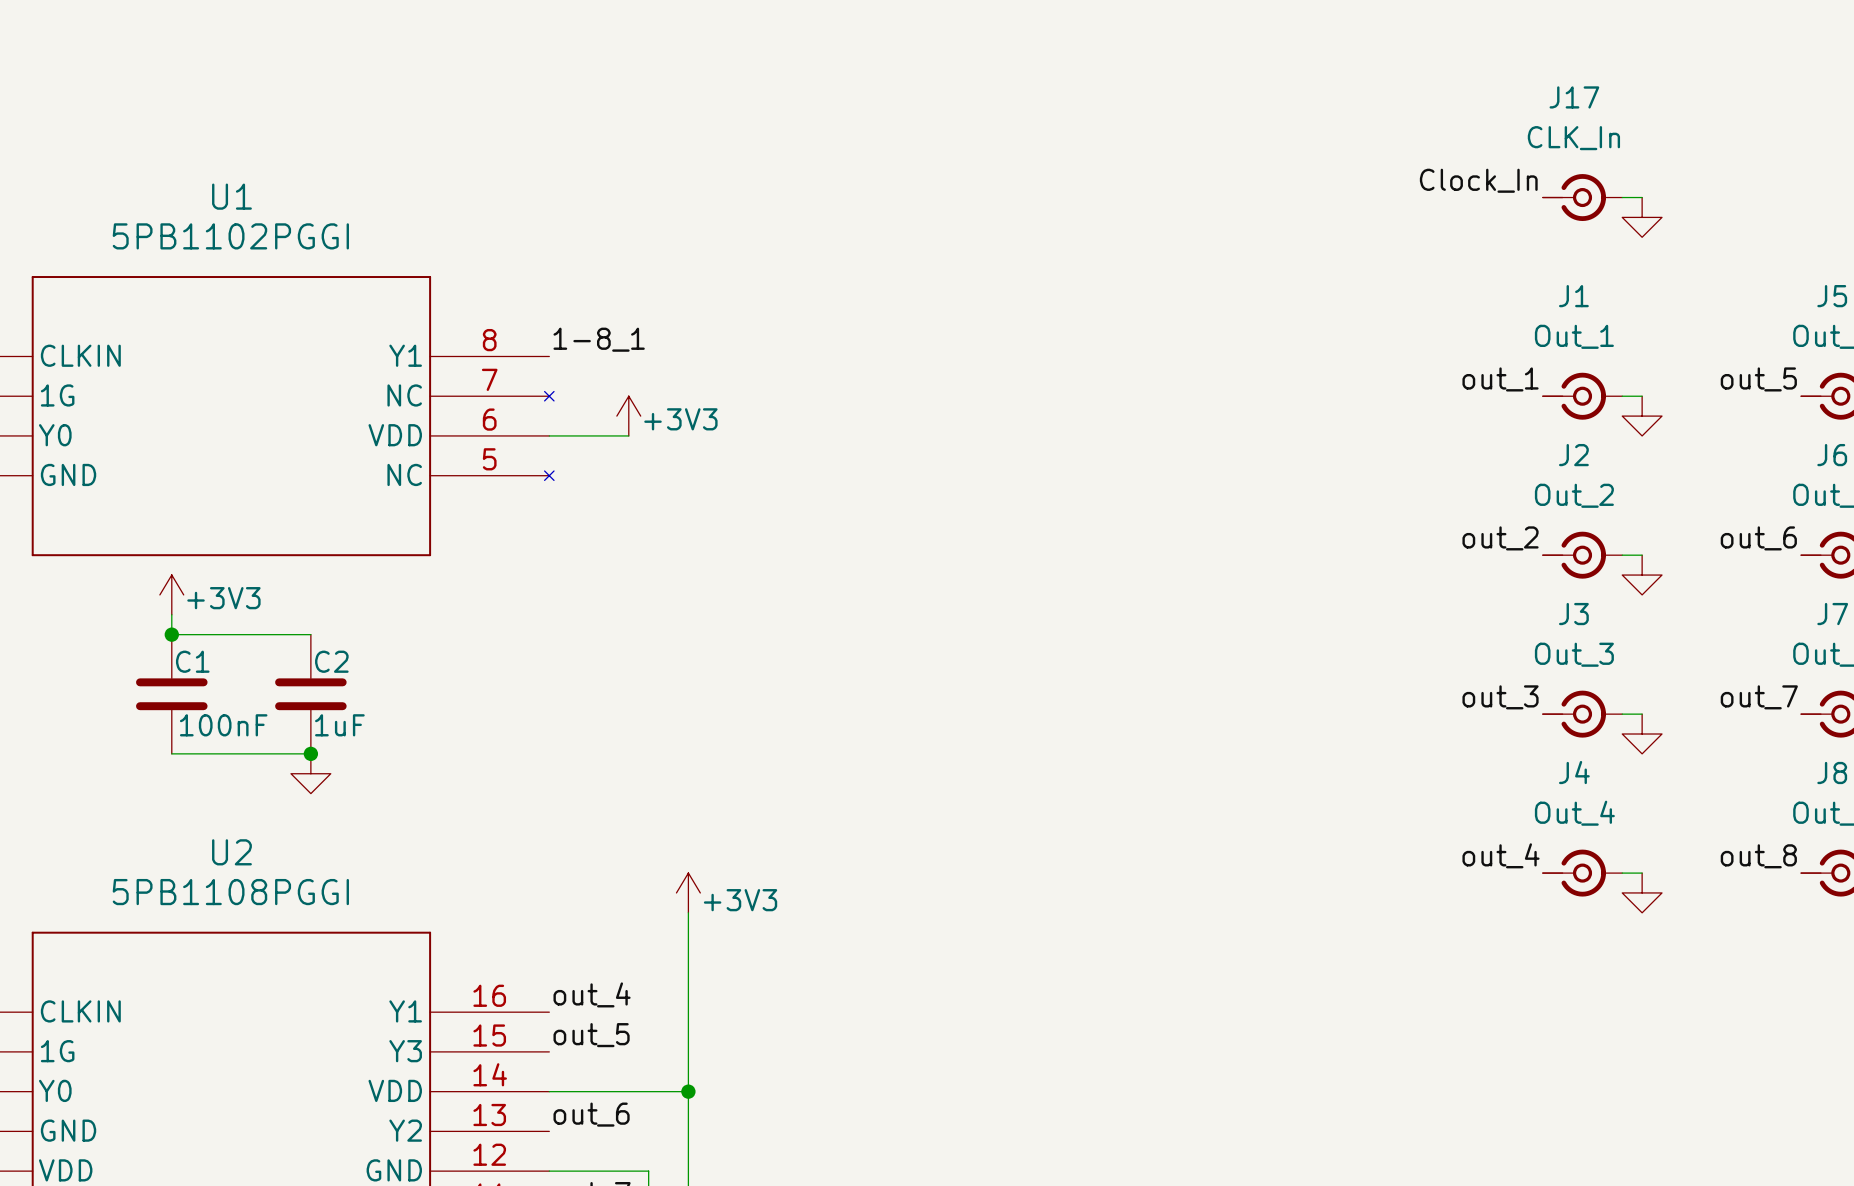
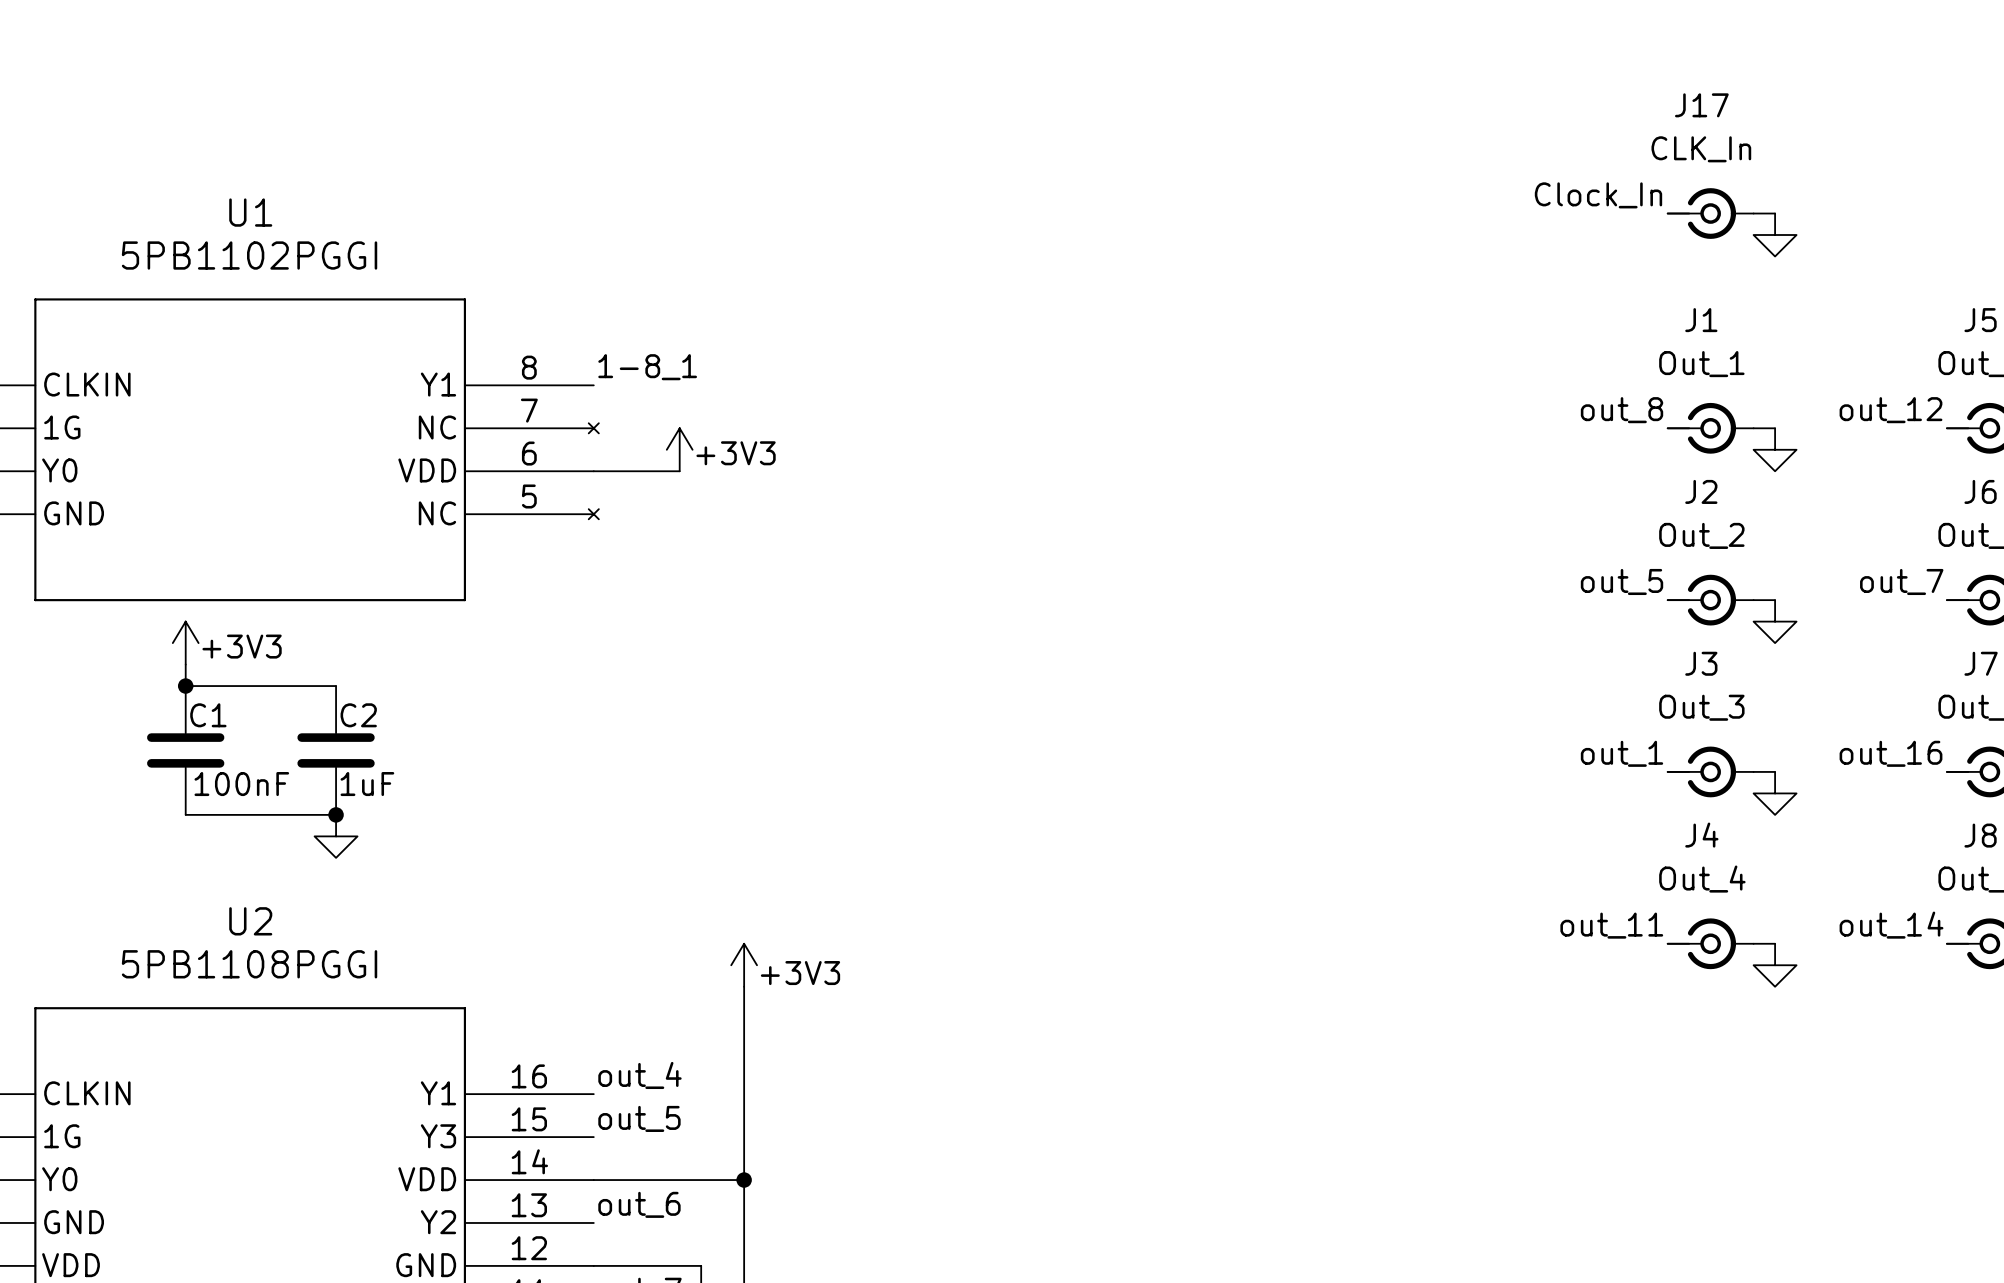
label: out_1 (1500, 379) -> out_8 (1622, 410)
label: out_5 (1758, 379) -> out_12 (1891, 410)
label: out_2 (1500, 538) -> out_5 (1622, 581)
label: out_6 (1758, 538) -> out_7 (1901, 581)
label: out_3 (1500, 697) -> out_1 (1622, 753)
label: out_7 (1759, 697) -> out_16 (1891, 753)
label: out_4 (1500, 855) -> out_11 (1611, 925)
label: out_8 (1758, 856) -> out_14 (1891, 925)

